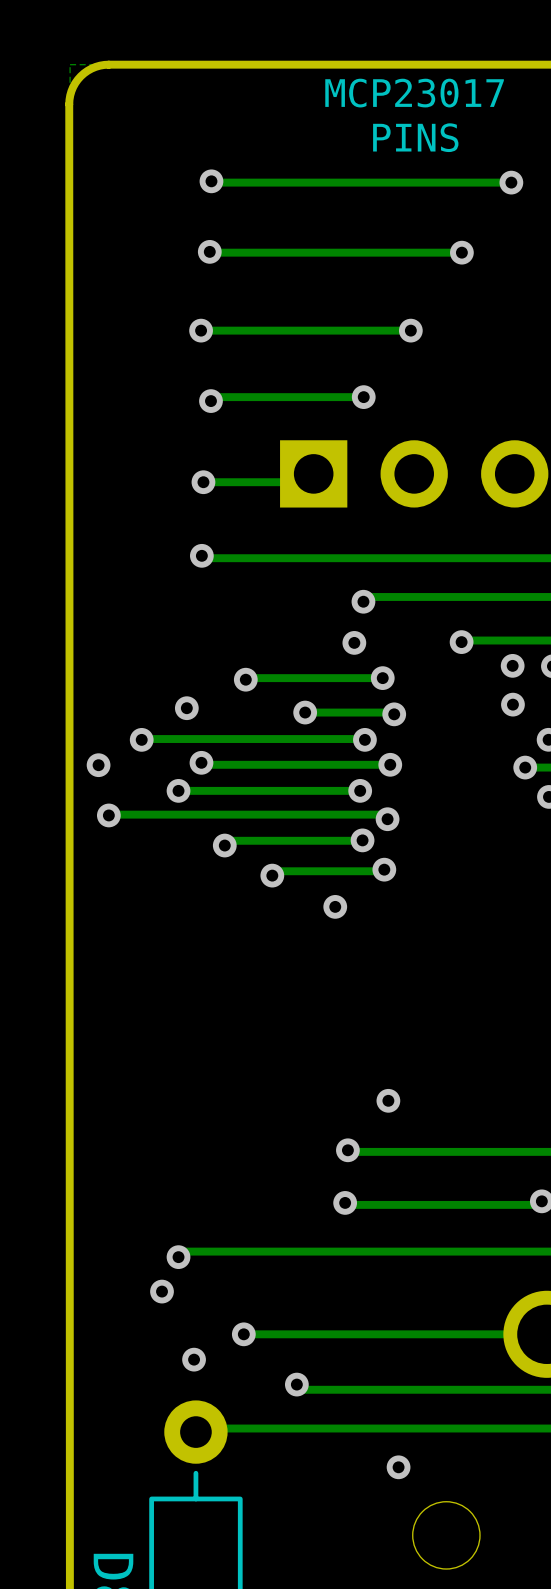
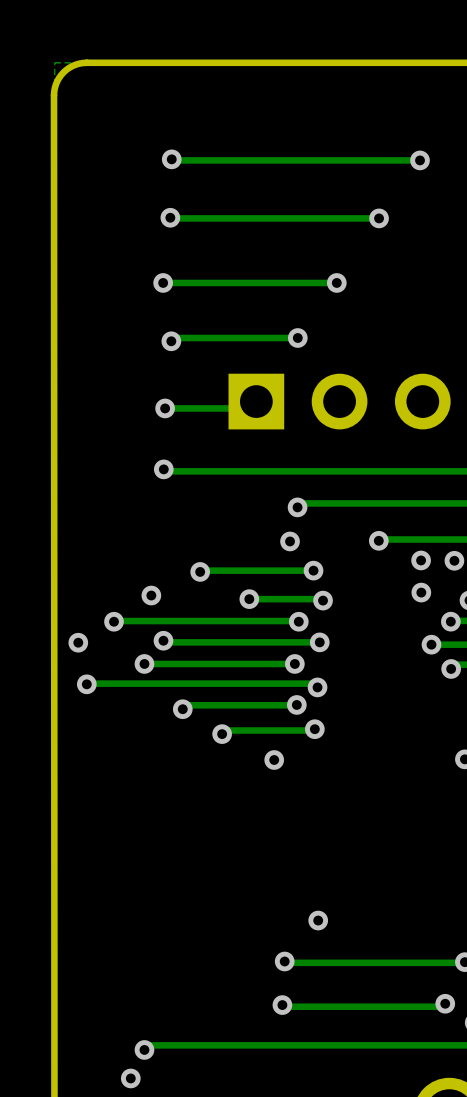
text: MCP23017 (414, 93) -> none
text: PINS (415, 137) -> none

